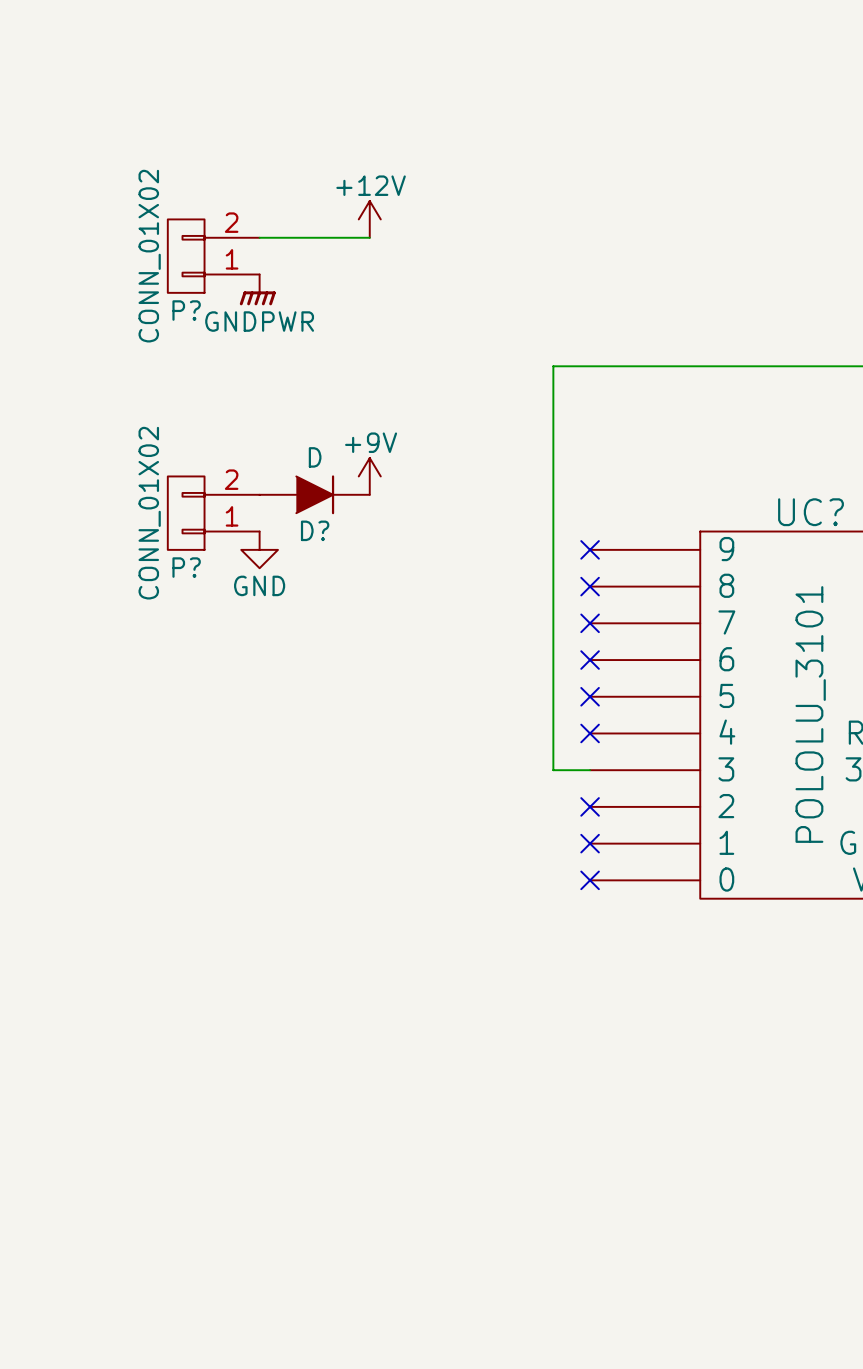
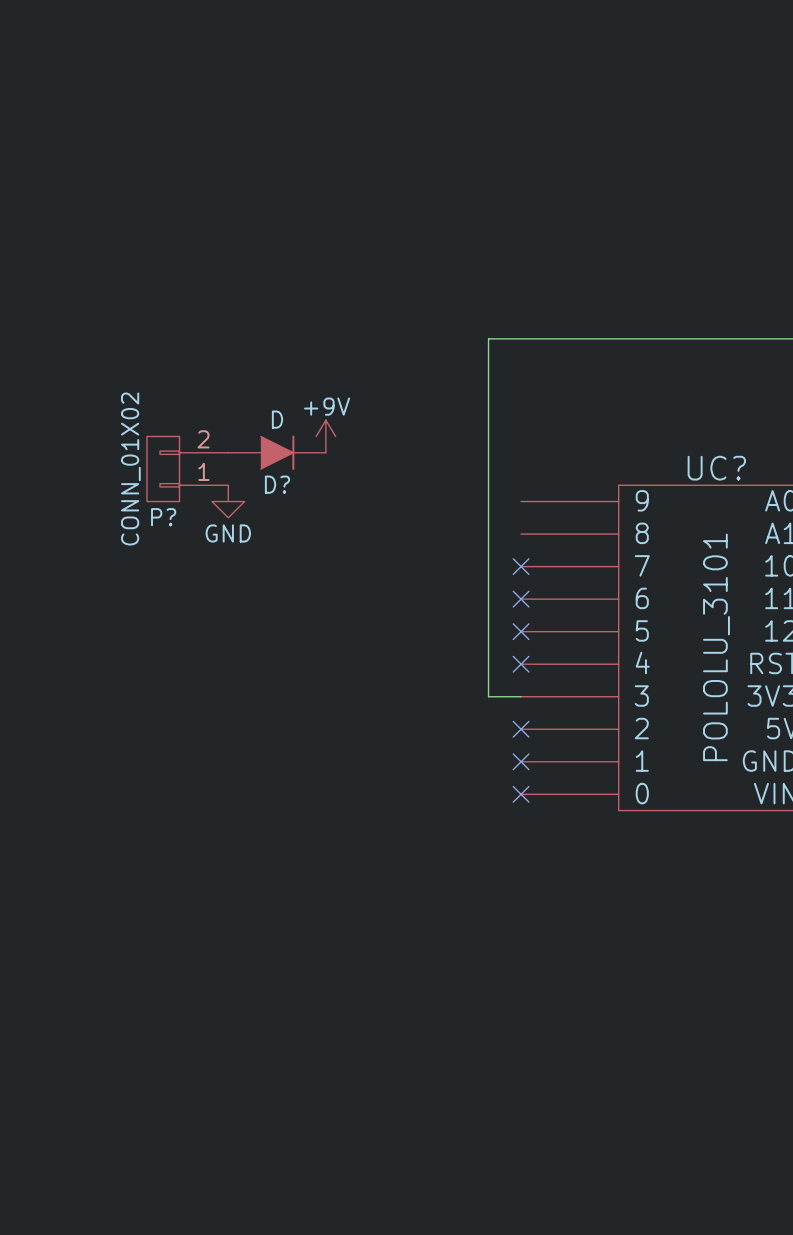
power symbol: +12V (369, 219) -> none
wire: (259, 237) (369, 237) -> none
P?: CONN_01X02 (213, 256) -> none
power symbol: GNDPWR (257, 289) -> none
no-connect mark: (590, 549) -> none
no-connect mark: (590, 586) -> none

